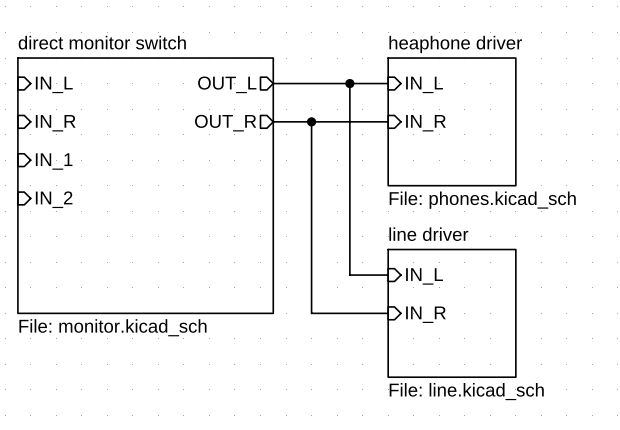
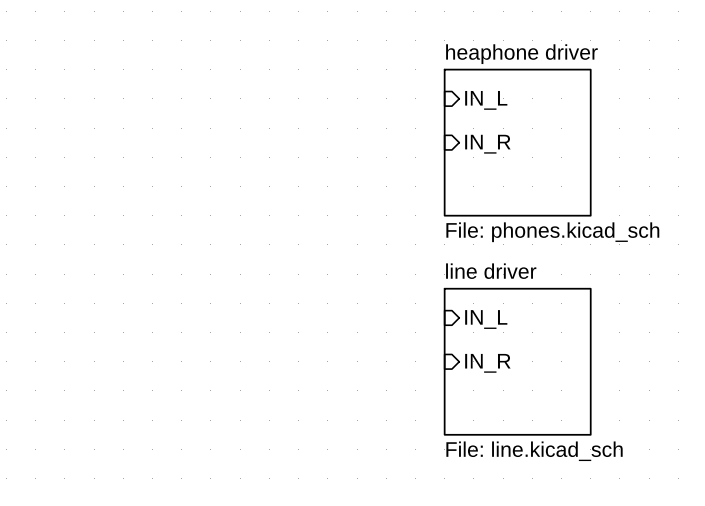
wire: (273, 83) (388, 83) -> none
wire: (349, 83) (349, 275) (388, 275) -> none
junction: (349, 83) -> none
sheet pin: IN_L (54, 84) -> none
sheet pin: OUT_L (227, 84) -> none
wire: (273, 121) (388, 121) -> none
wire: (311, 121) (311, 313) (388, 313) -> none
junction: (311, 121) -> none
sheet pin: IN_R (55, 123) -> none
sheet pin: OUT_R (225, 123) -> none
sheet pin: IN_1 (54, 161) -> none
sheet direct monitor switch: File: monitor.kicad_sch (145, 185) -> none
sheet pin: IN_2 (54, 199) -> none

